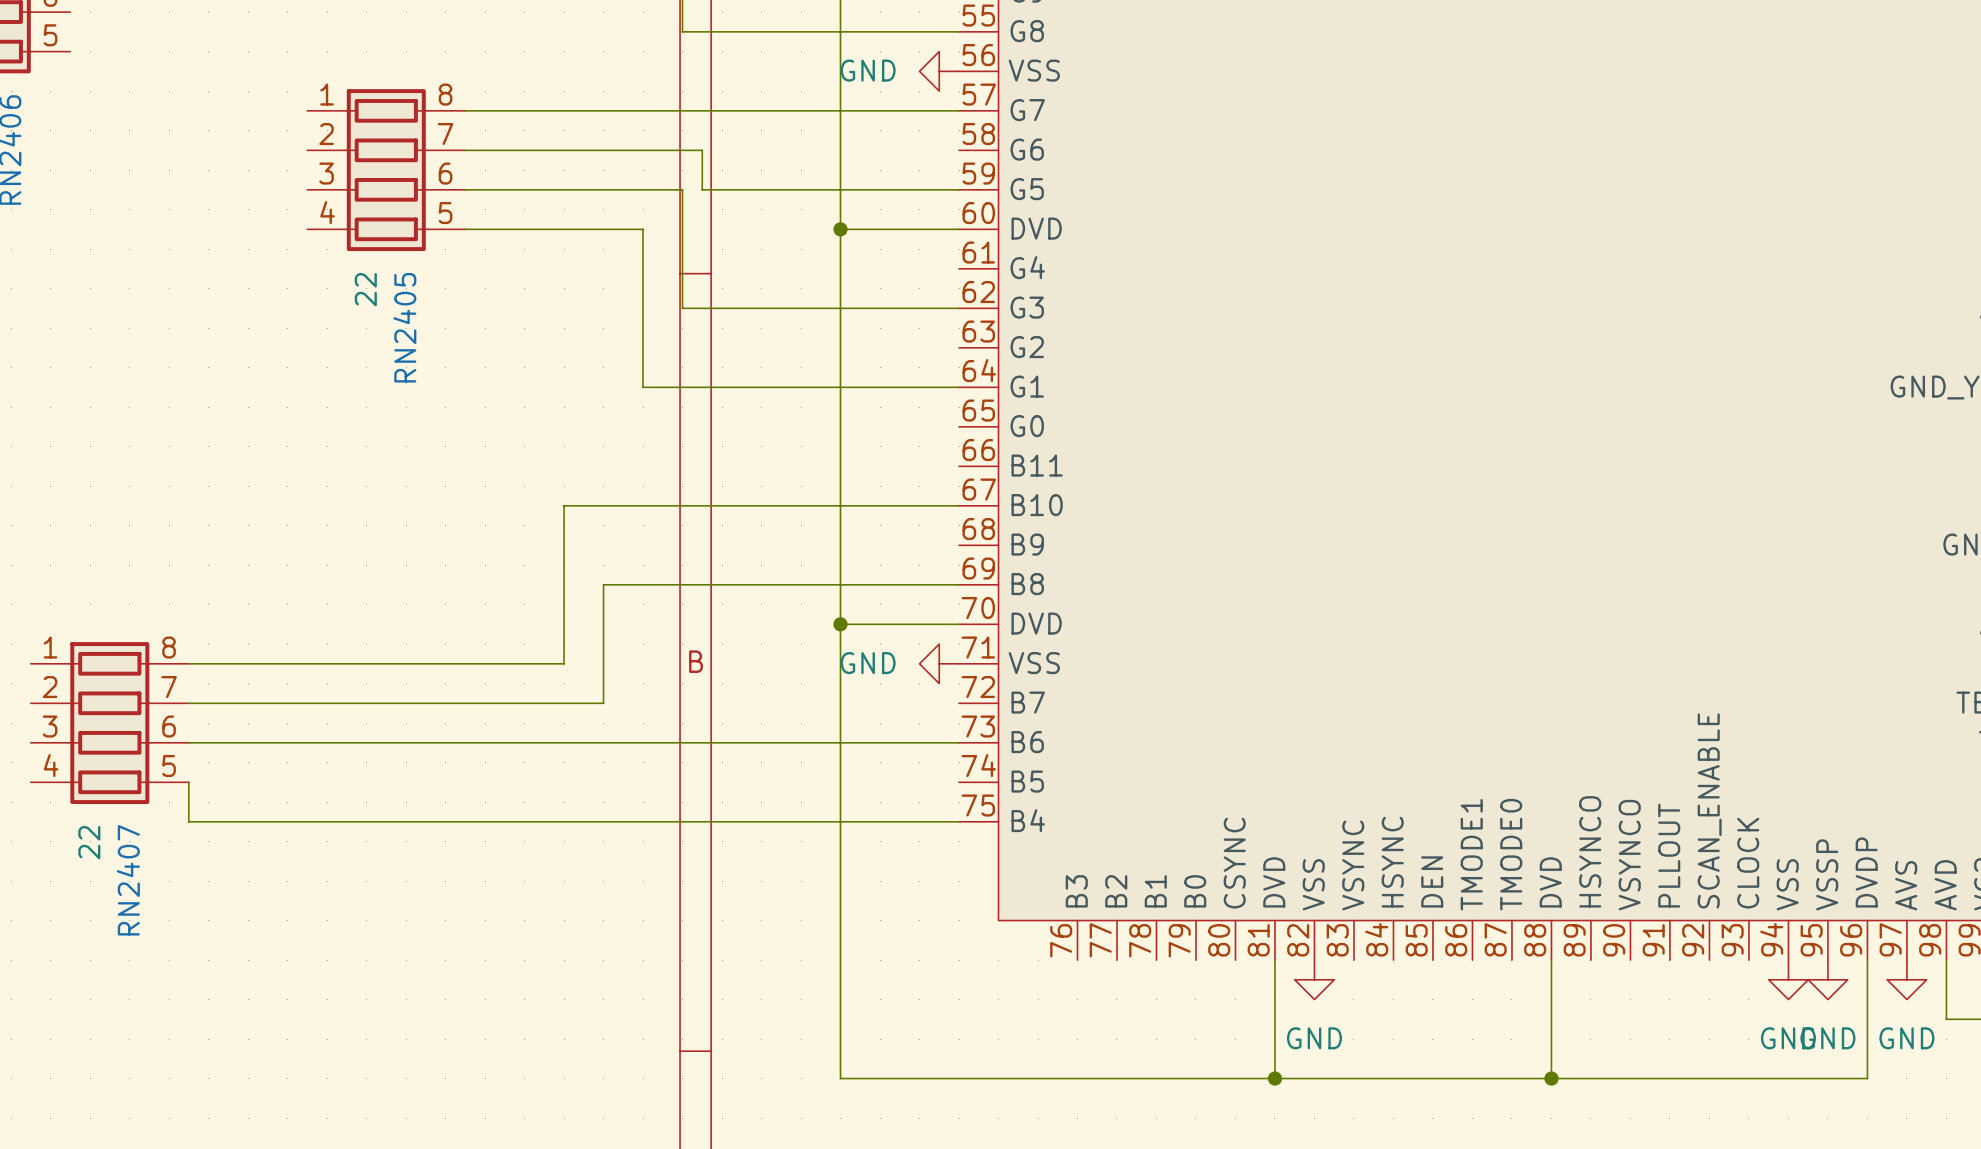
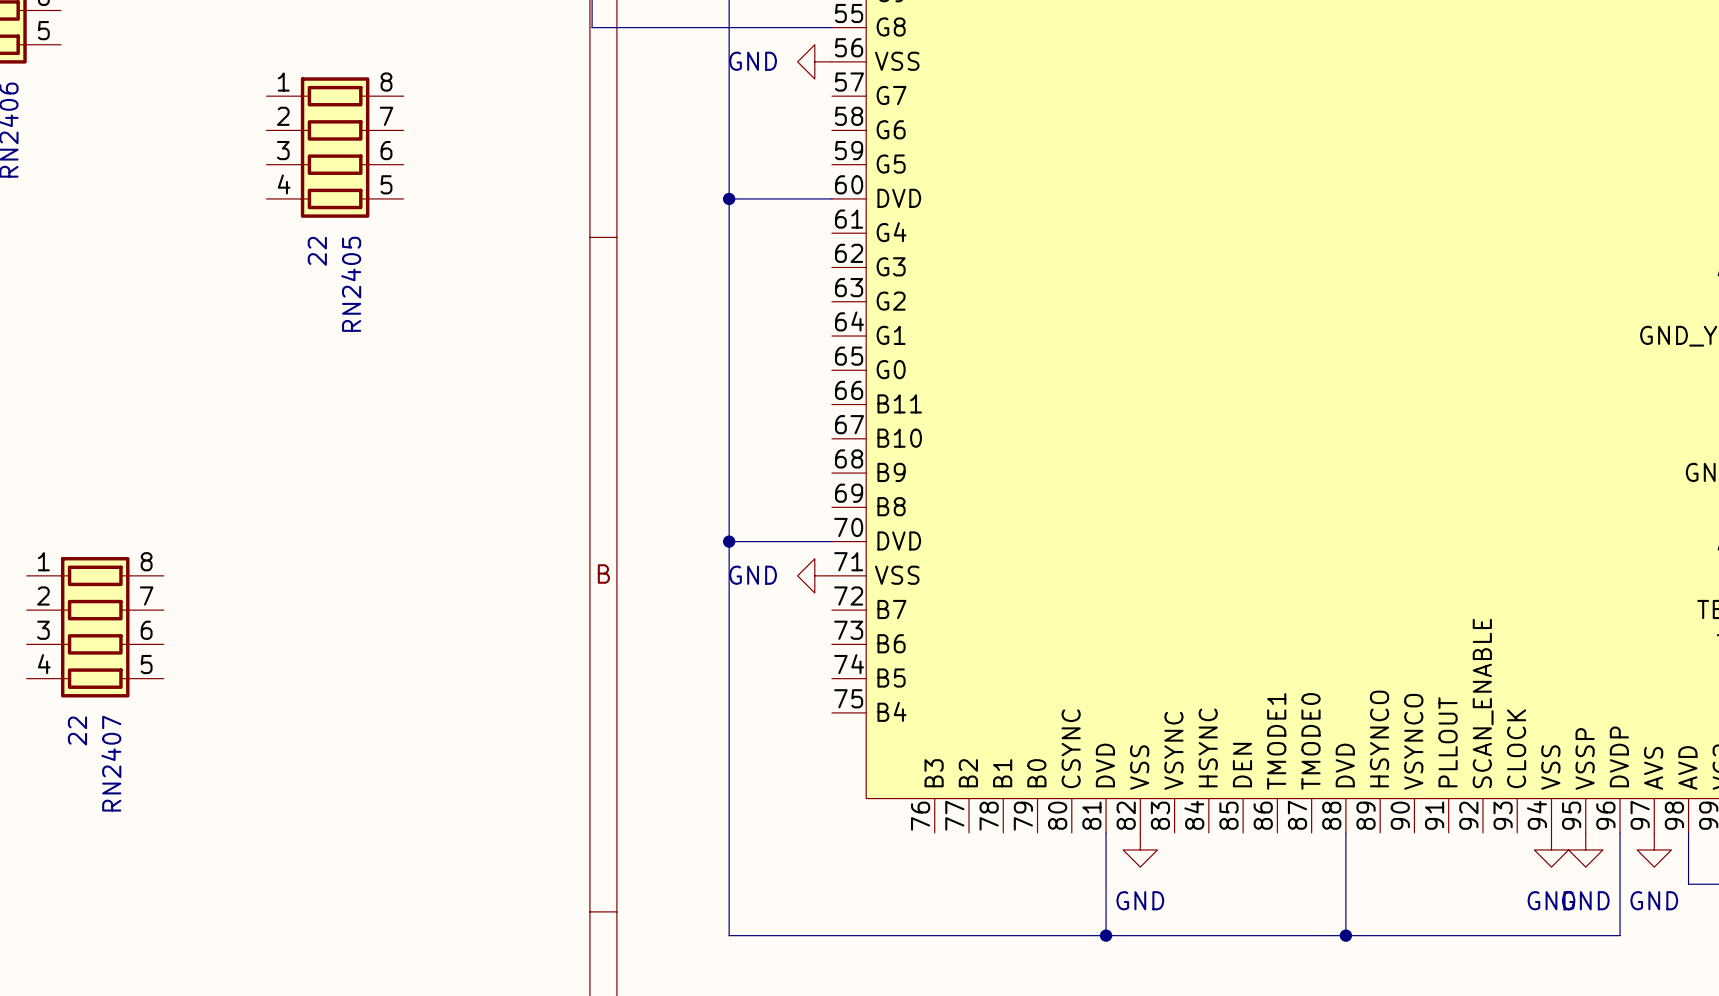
wire: (465, 110) (959, 110) -> none
wire: (465, 150) (702, 150) (702, 189) (959, 189) -> none
wire: (465, 189) (682, 189) (682, 308) (959, 308) -> none
wire: (465, 229) (643, 229) (643, 387) (959, 387) -> none
wire: (959, 505) (564, 505) (564, 663) (188, 663) -> none
wire: (959, 584) (603, 584) (603, 703) (188, 703) -> none
wire: (188, 742) (959, 742) -> none
wire: (188, 782) (188, 821) (959, 821) -> none

